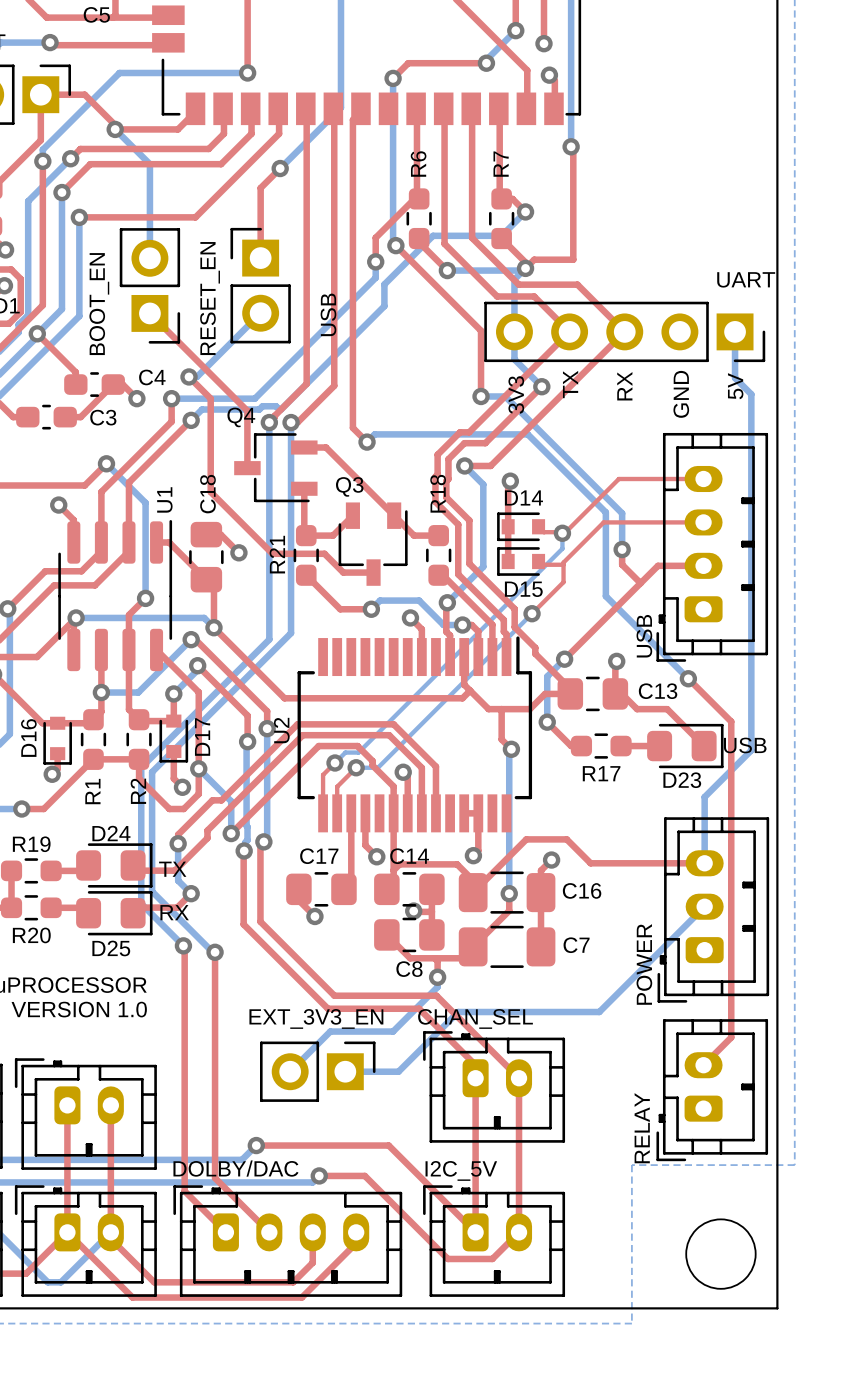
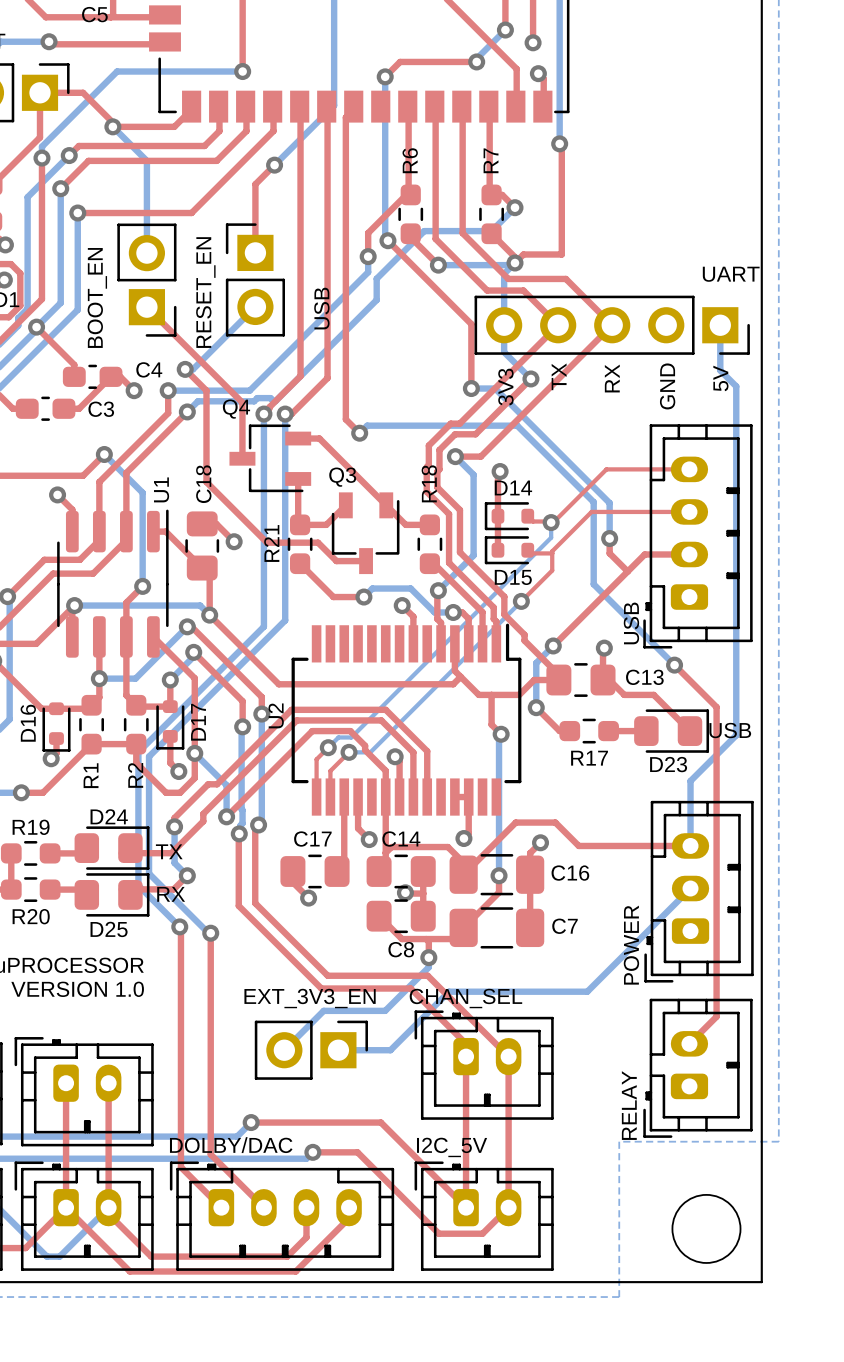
D14 footprint: [497, 512, 546, 542] -> [484, 502, 535, 531]
D15 footprint: [497, 547, 546, 576] -> [484, 536, 535, 565]
D17 footprint: [159, 714, 189, 763] -> [156, 700, 185, 750]
D16 footprint: [43, 716, 72, 765] -> [42, 702, 71, 752]

